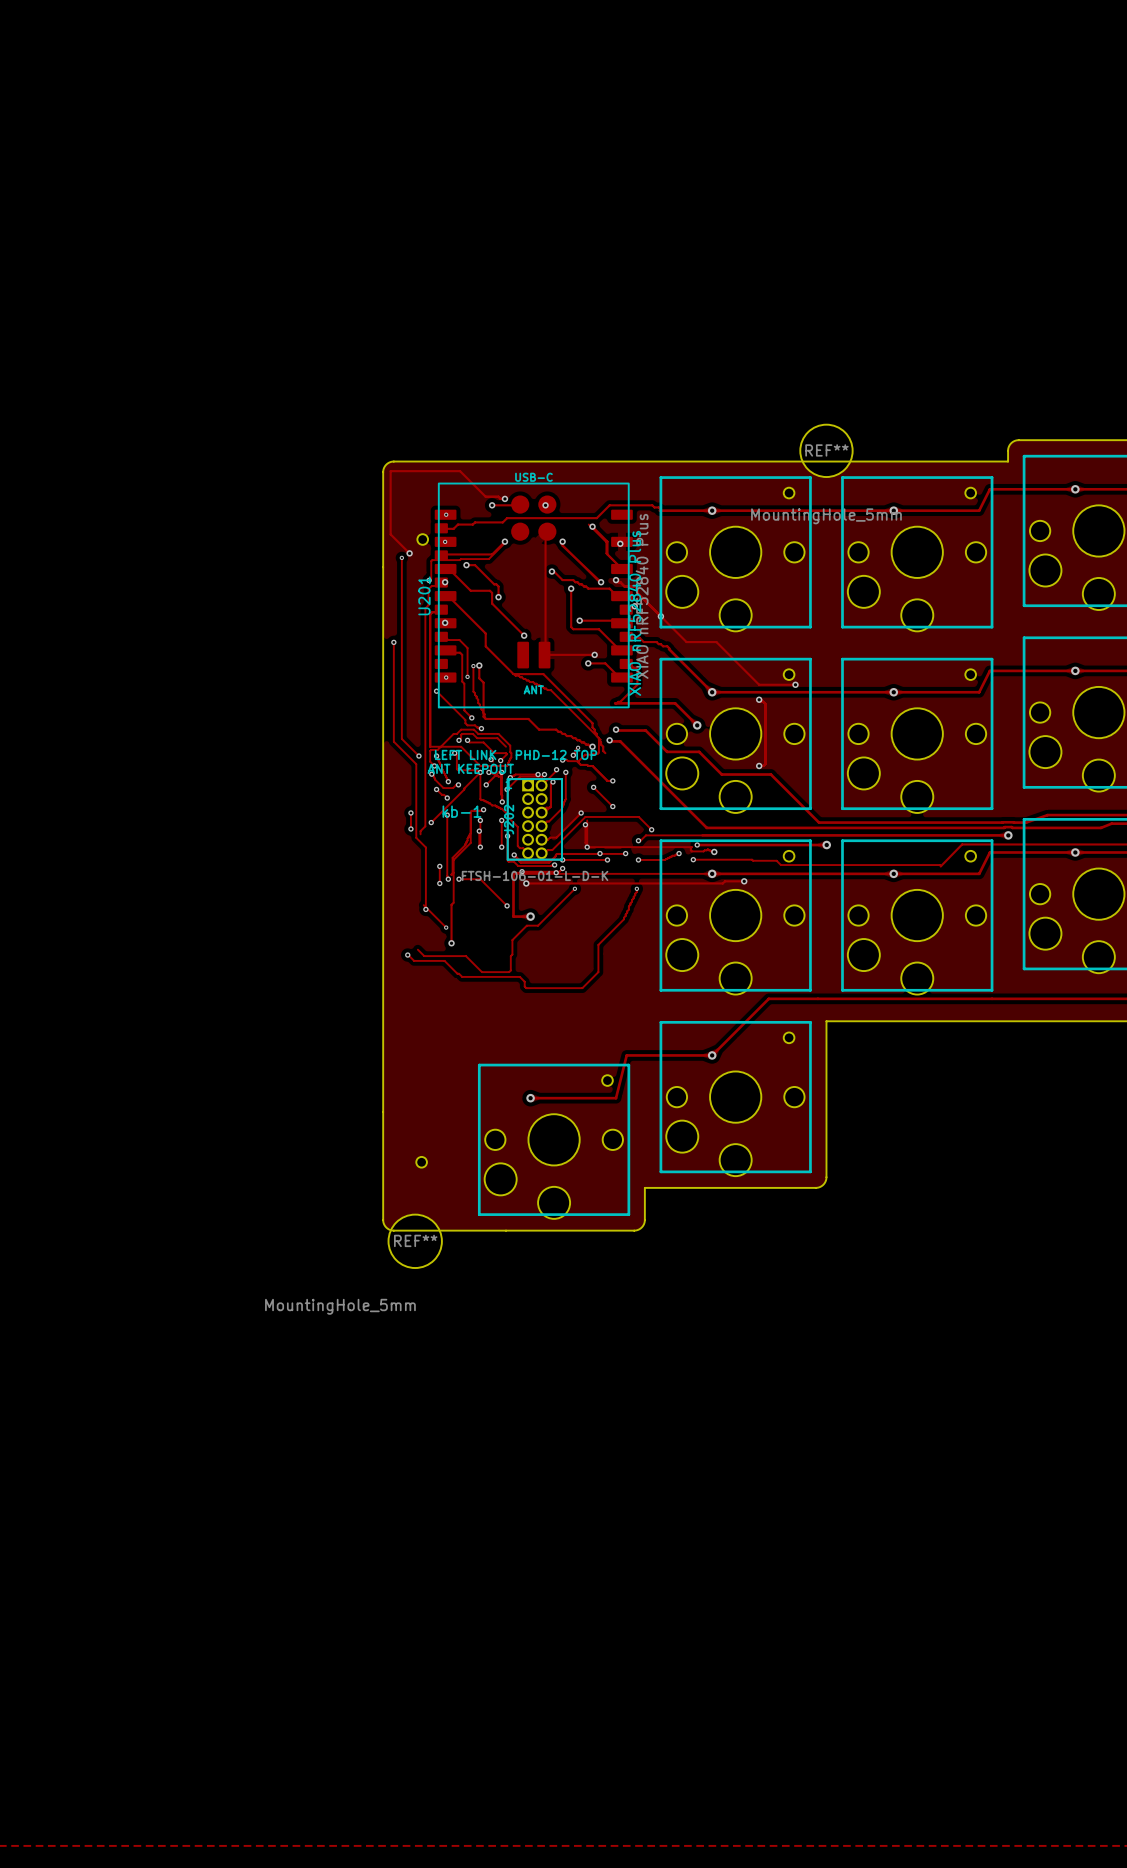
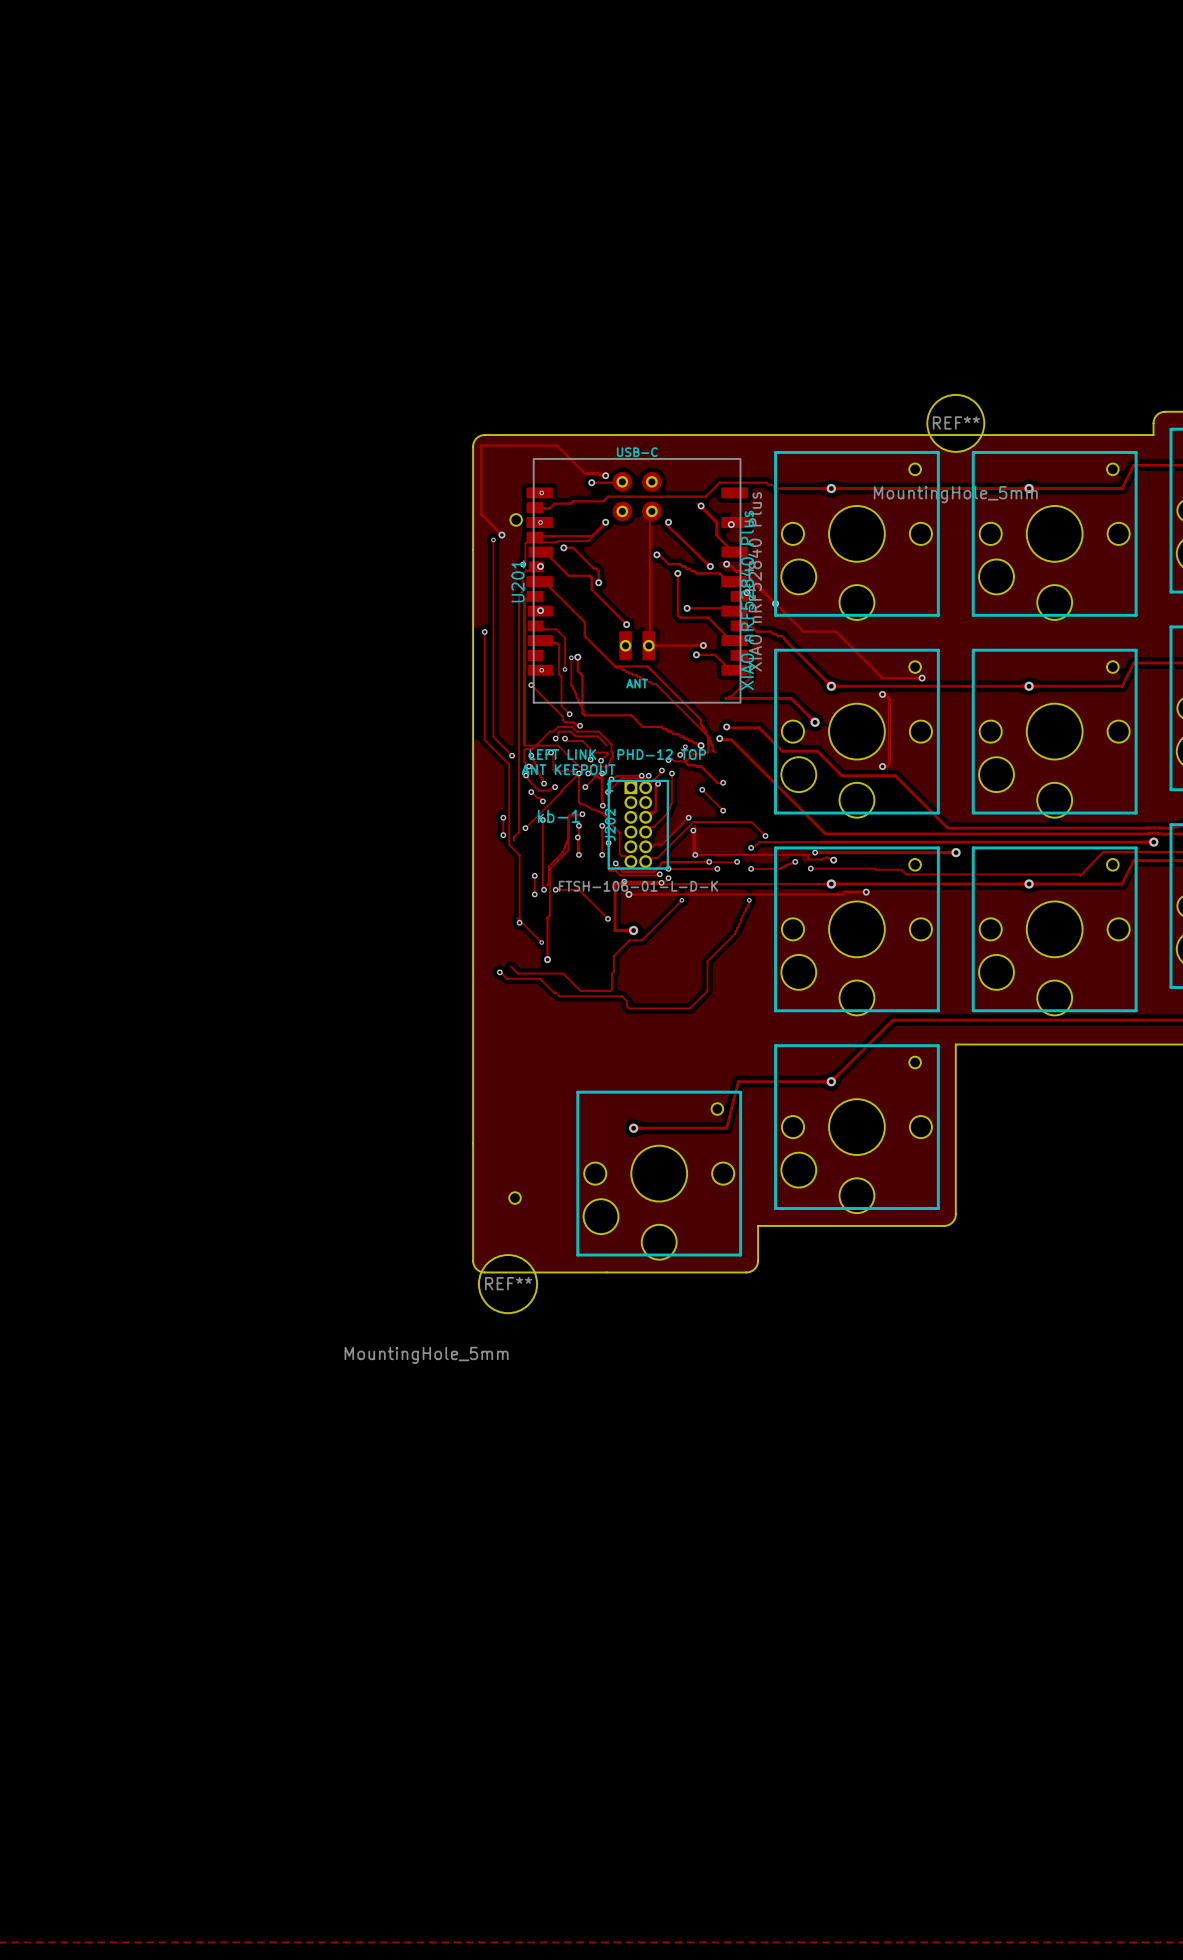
U201 footprint: [434, 482, 633, 709] -> [526, 458, 748, 704]
via: (545, 505) -> none

